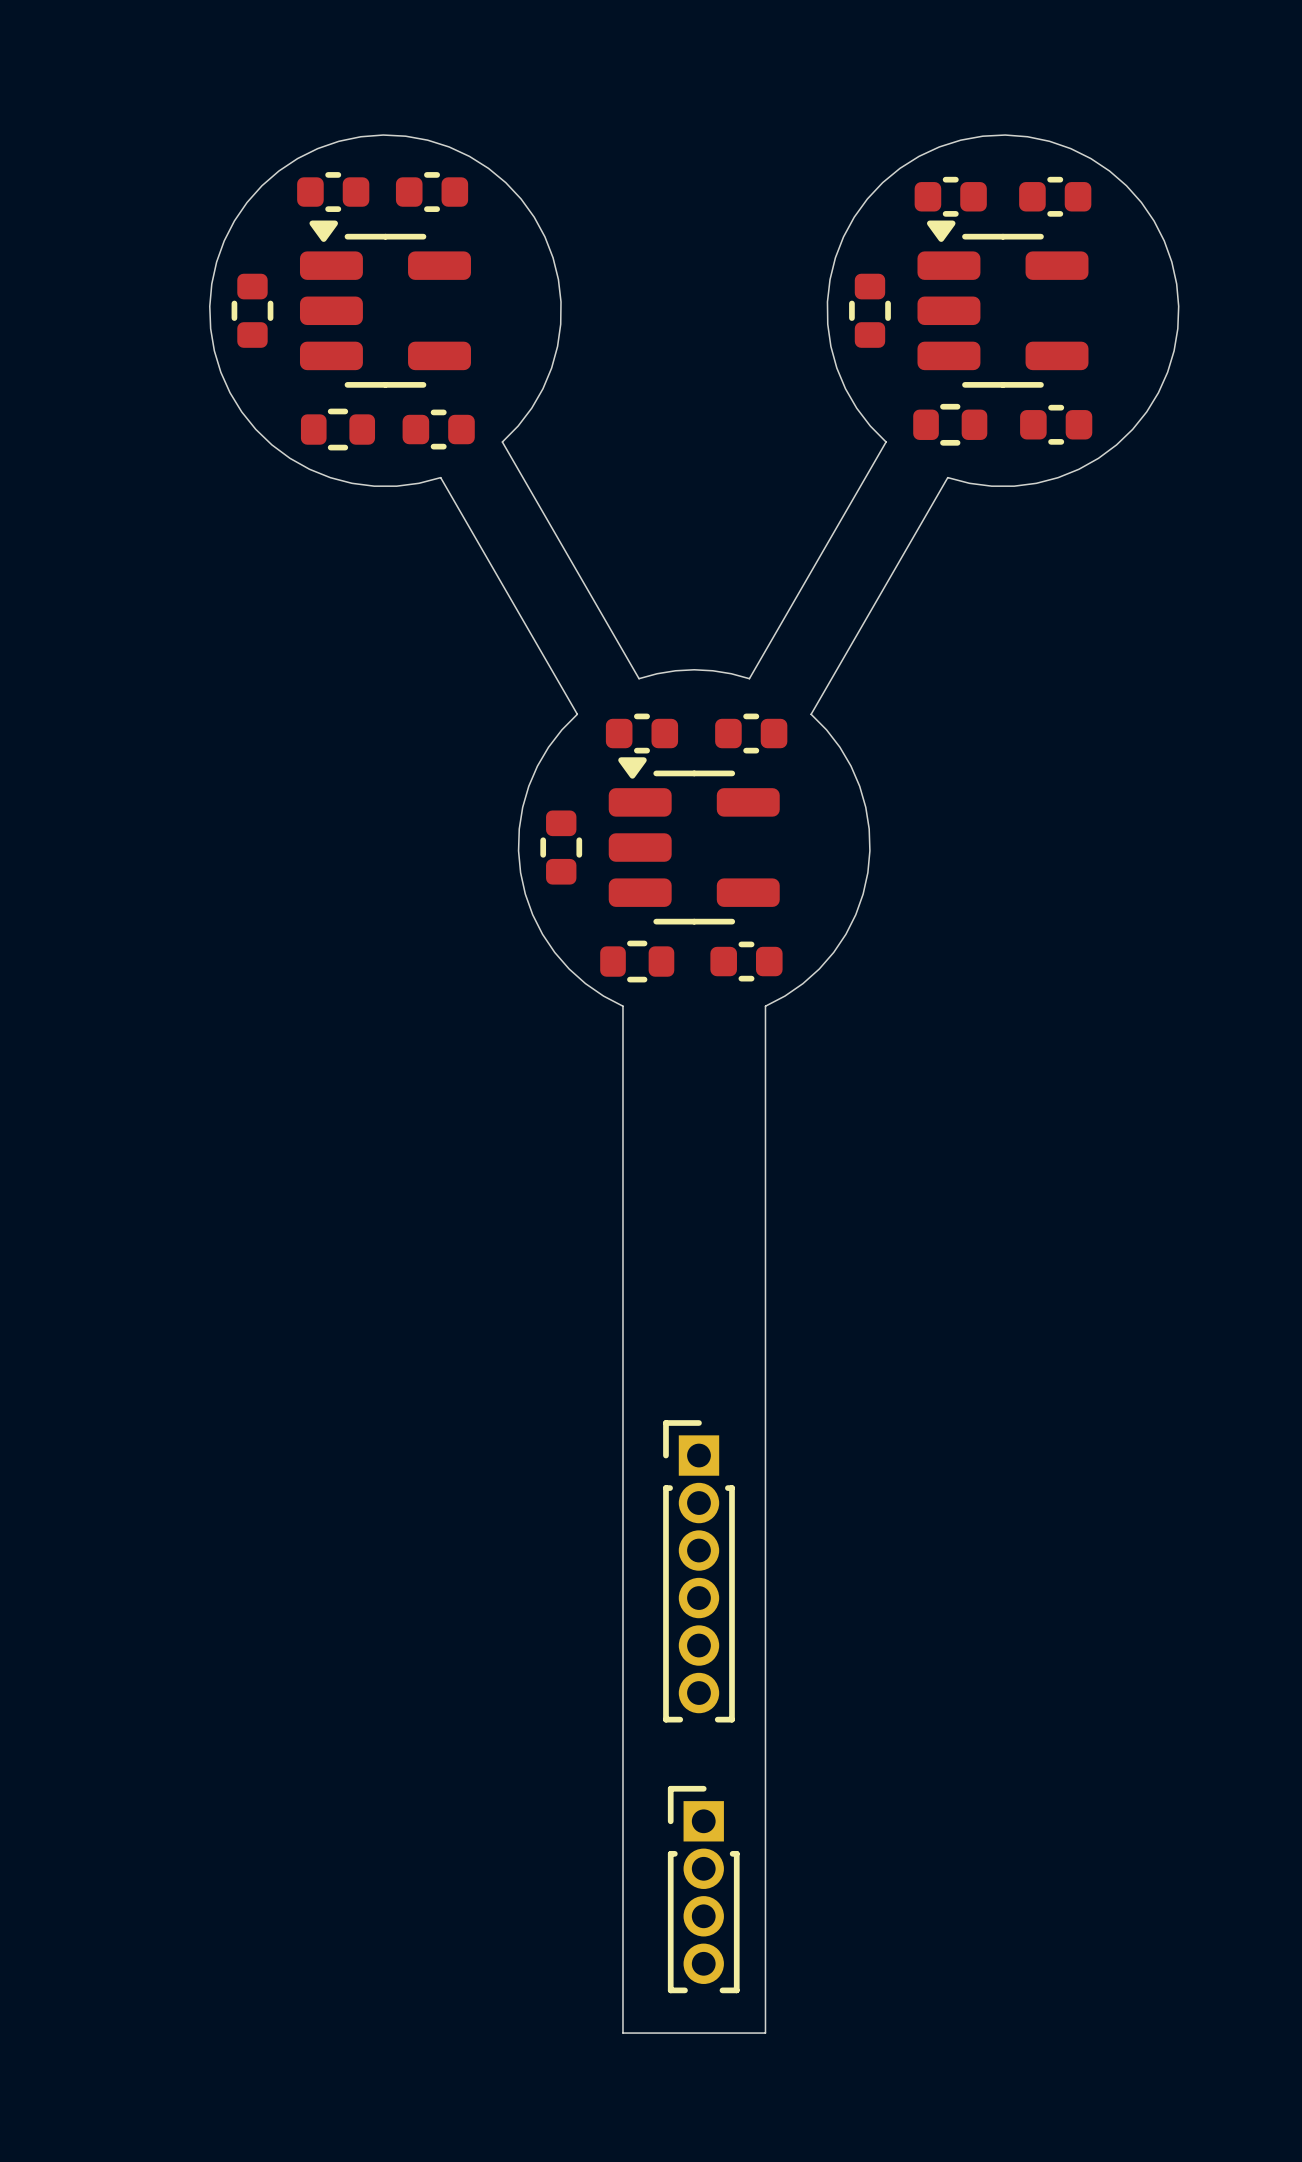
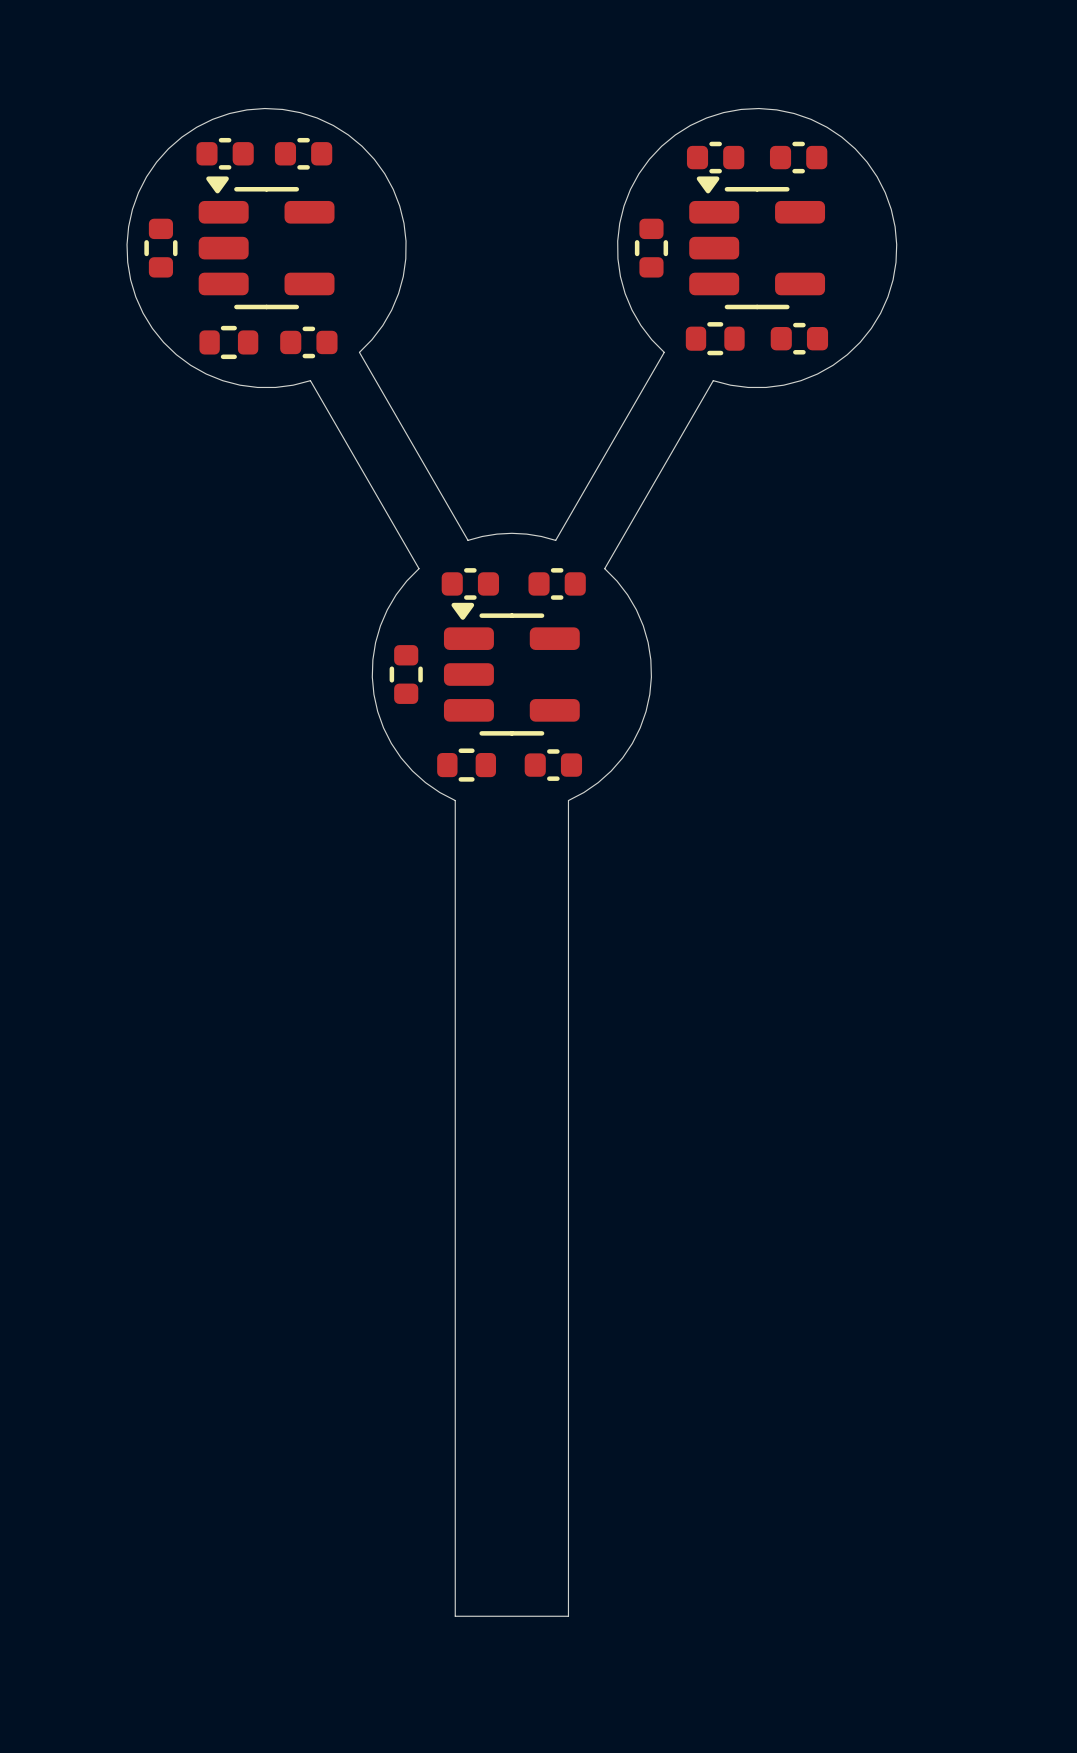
part: (698, 1571) -> none
part: (703, 1889) -> none

